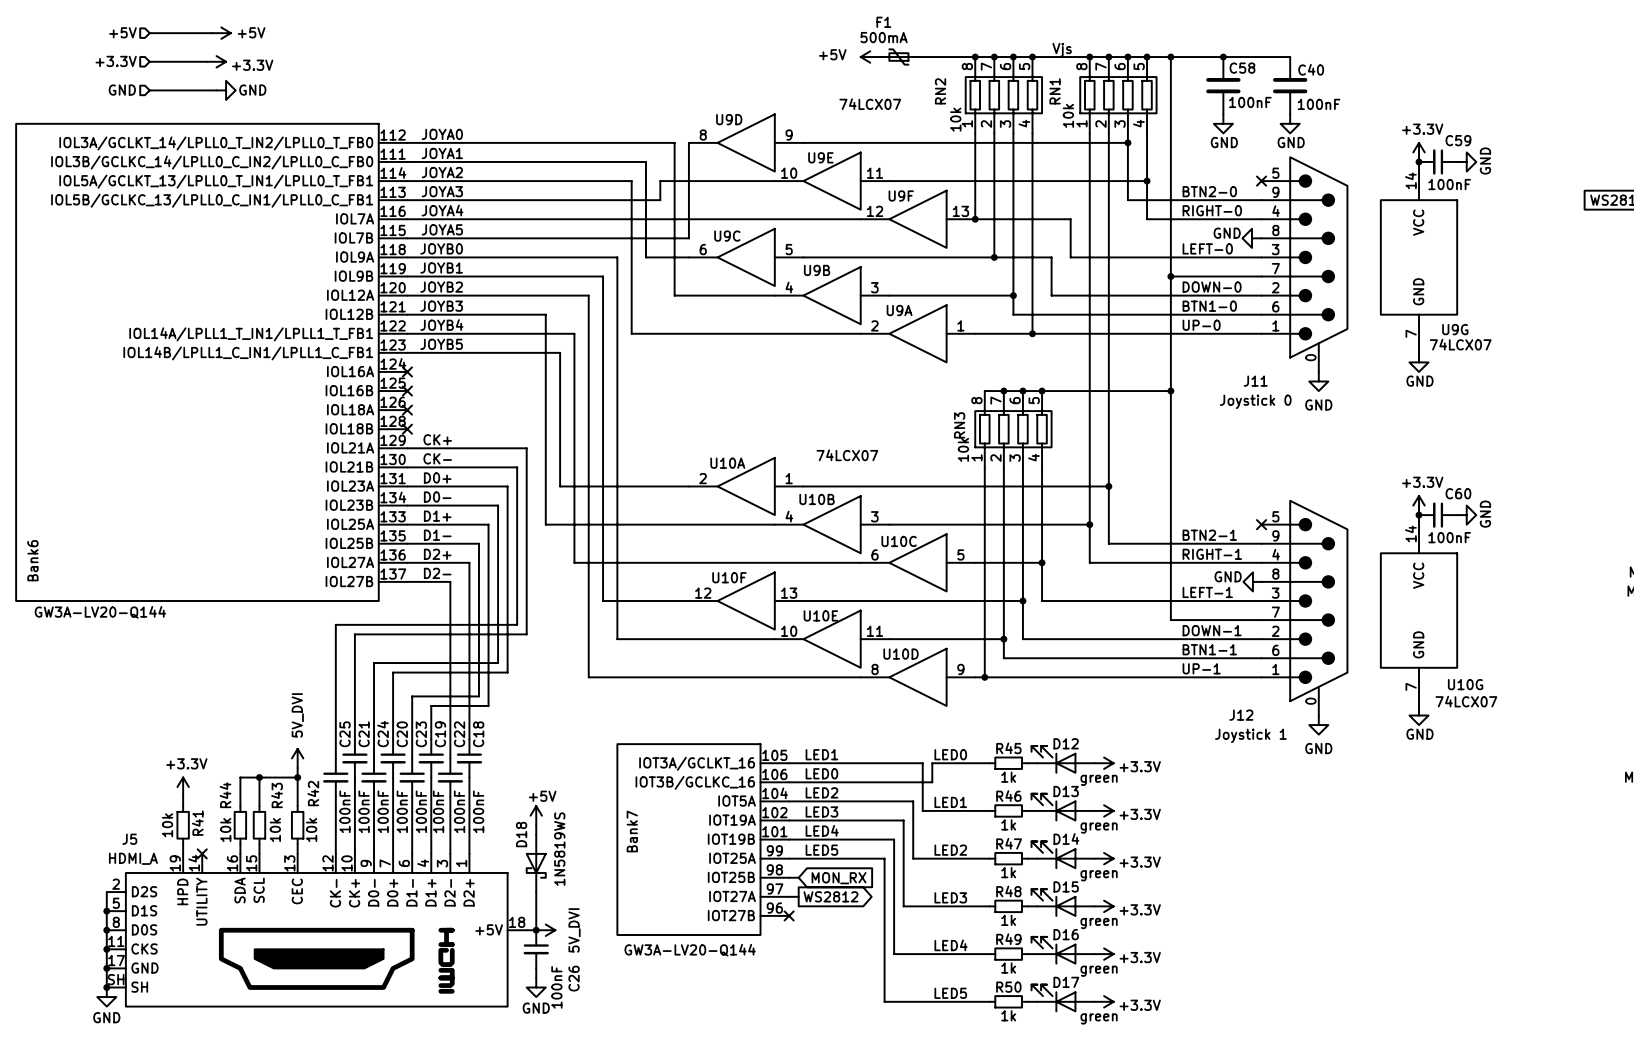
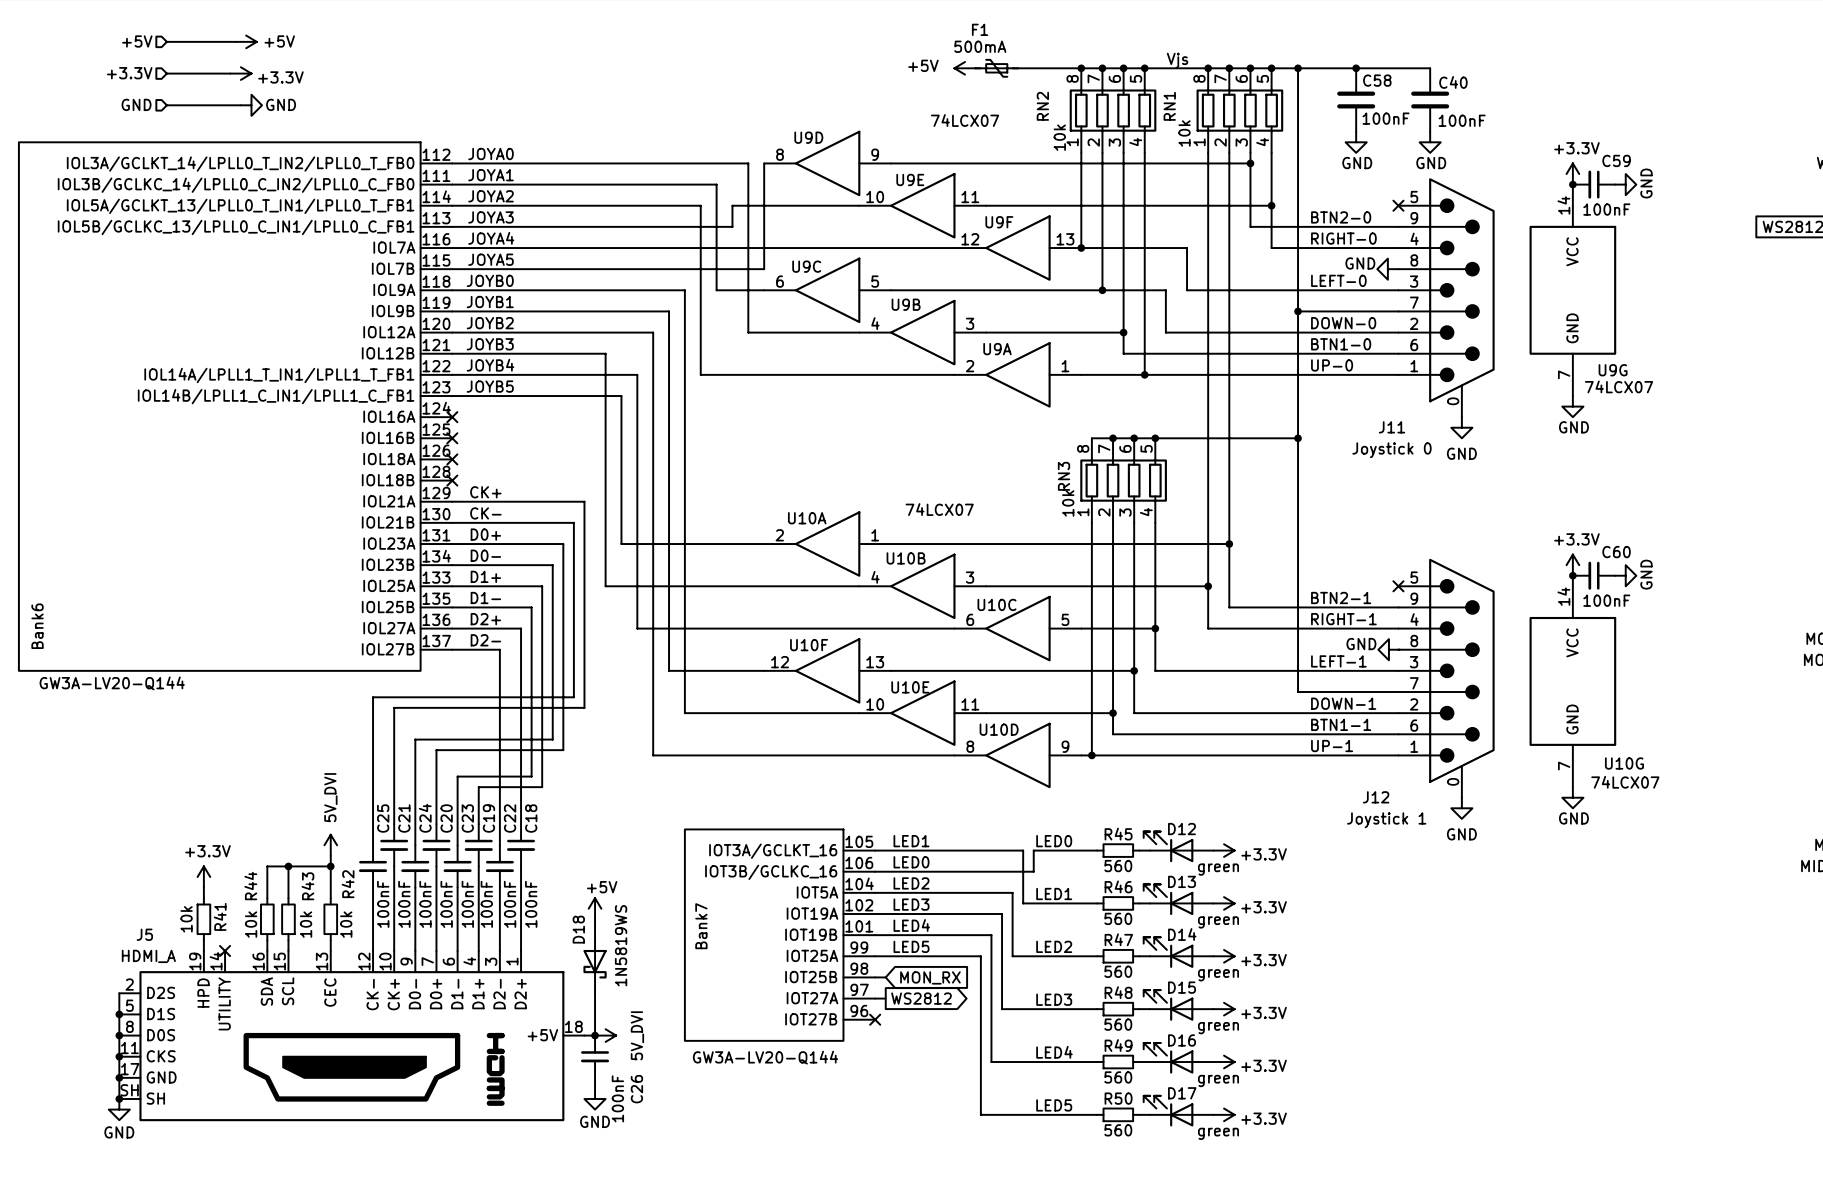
R45 value: 1k (1008, 777) -> 560 (1118, 866)
R46 value: 1k (1008, 824) -> 560 (1118, 918)
R47 value: 1k (1008, 872) -> 560 (1118, 971)
R48 value: 1k (1008, 920) -> 560 (1118, 1024)
R49 value: 1k (1008, 968) -> 560 (1118, 1077)
R50 value: 1k (1008, 1015) -> 560 (1118, 1130)

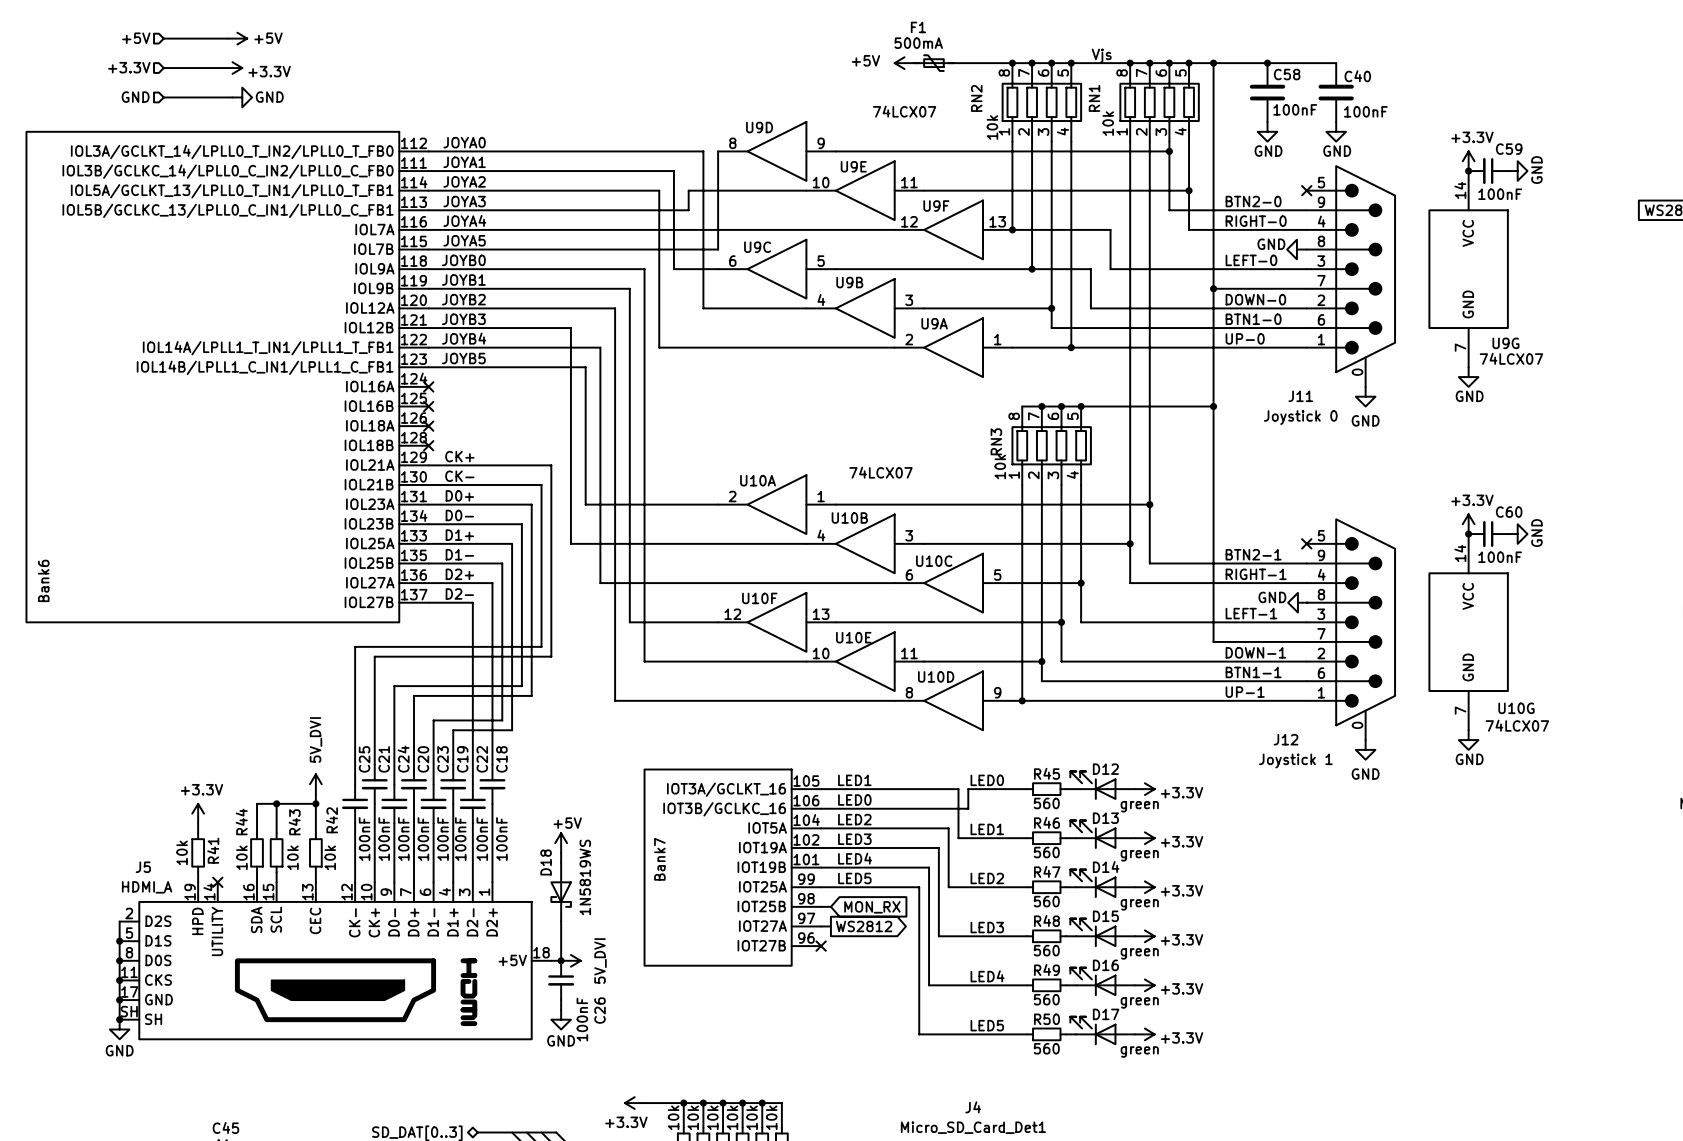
part value: GW3A-LV20-Q144 (112, 683) -> none
part value: GW3A-LV20-Q144 (765, 1057) -> none

